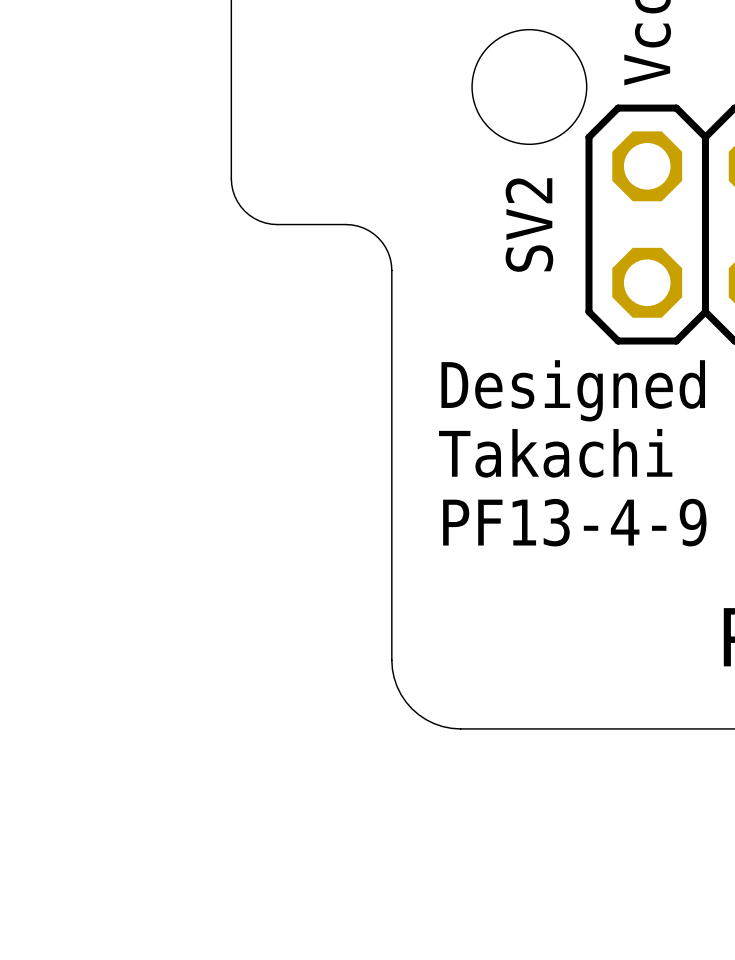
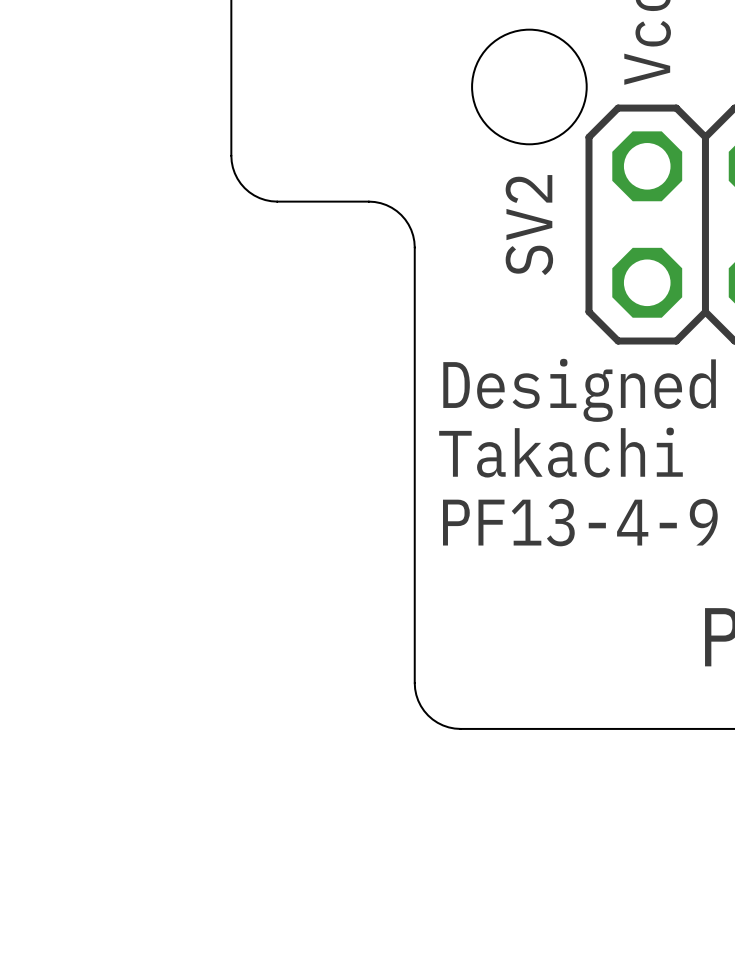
board edge: (231, 155) (231, 184) (234, 196) (240, 206) (254, 218) (271, 224) (357, 226) (373, 234) (382, 242) (388, 252) (391, 270) (392, 669) (397, 686) (411, 708) (434, 723) (460, 728) -> (231, 155) (234, 173) (240, 183) (249, 192) (259, 198) (277, 201) (380, 203) (396, 211) (405, 219) (411, 229) (414, 247) (415, 689) (420, 706) (432, 719) (443, 725) (460, 728)

